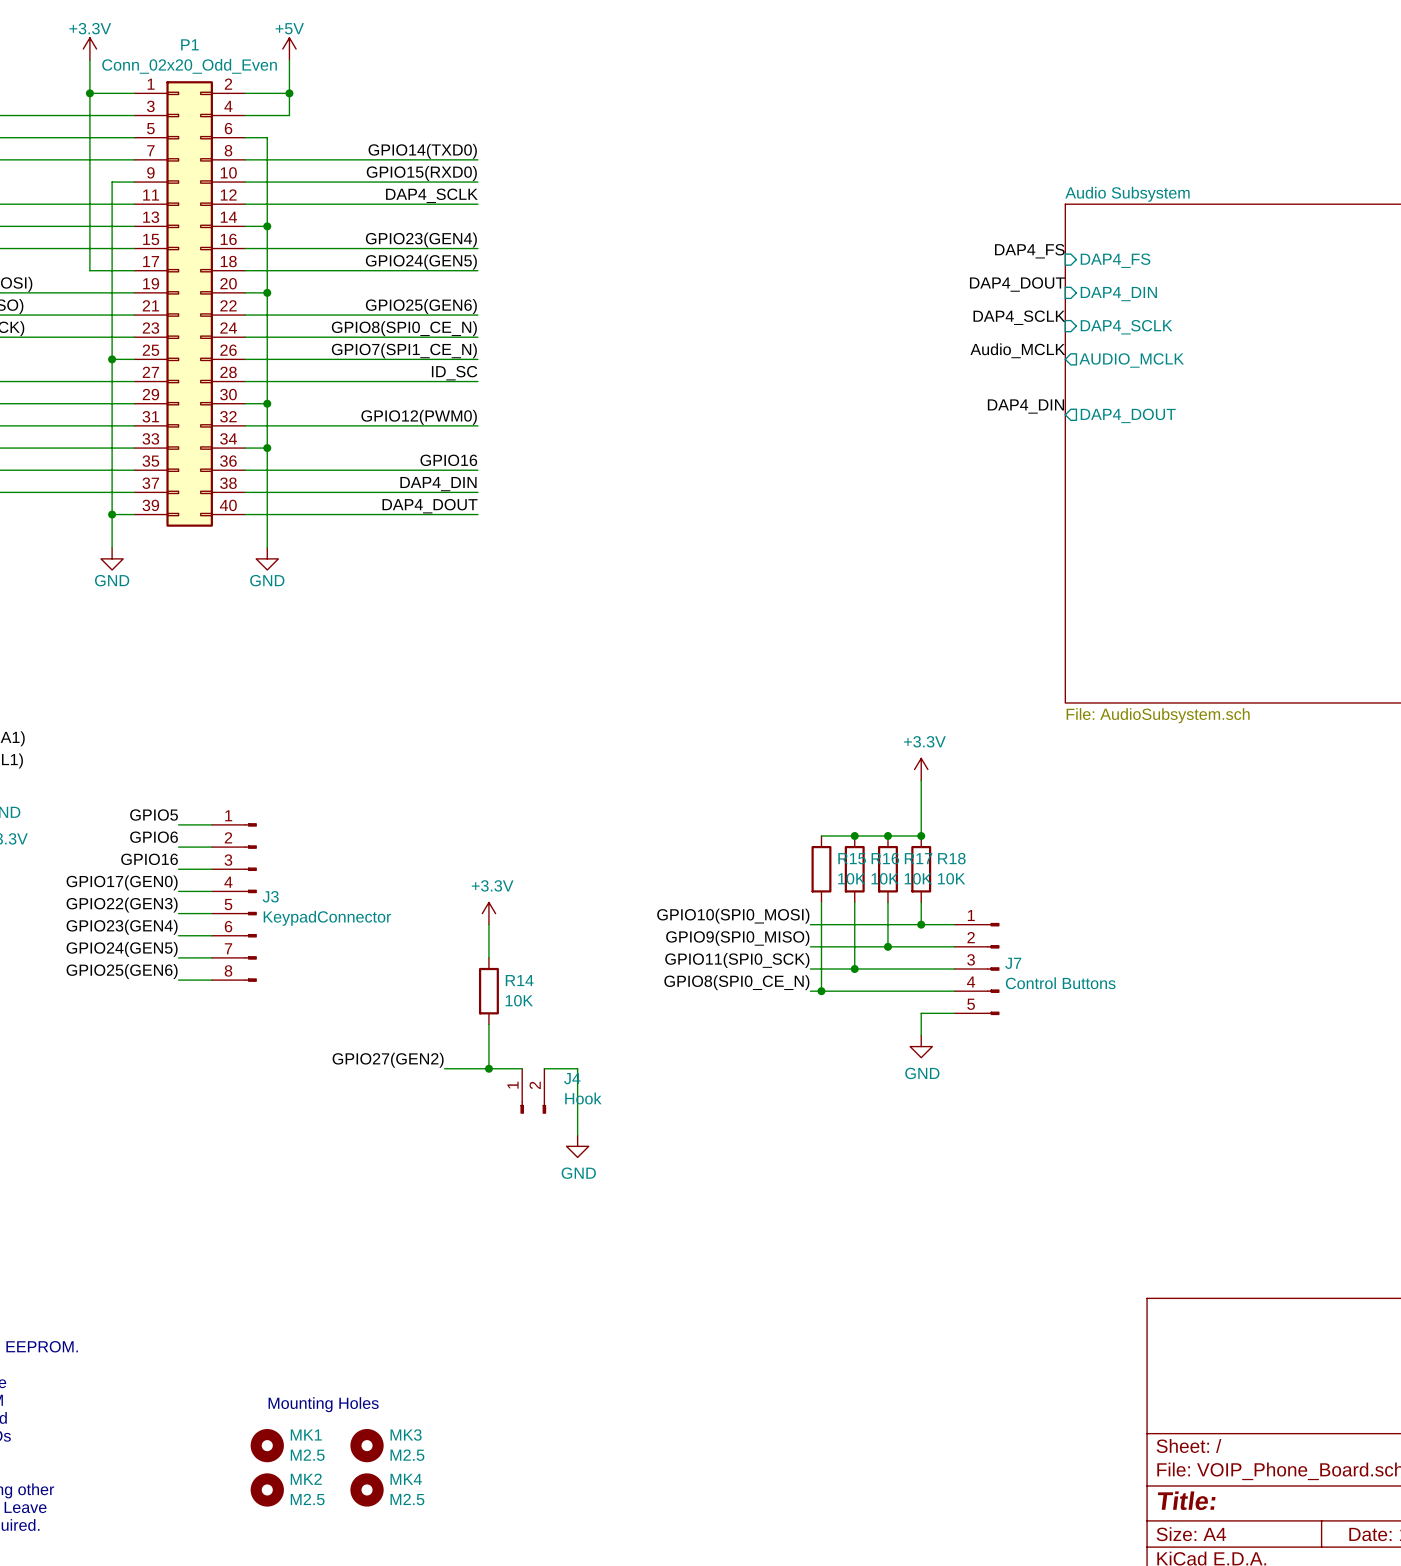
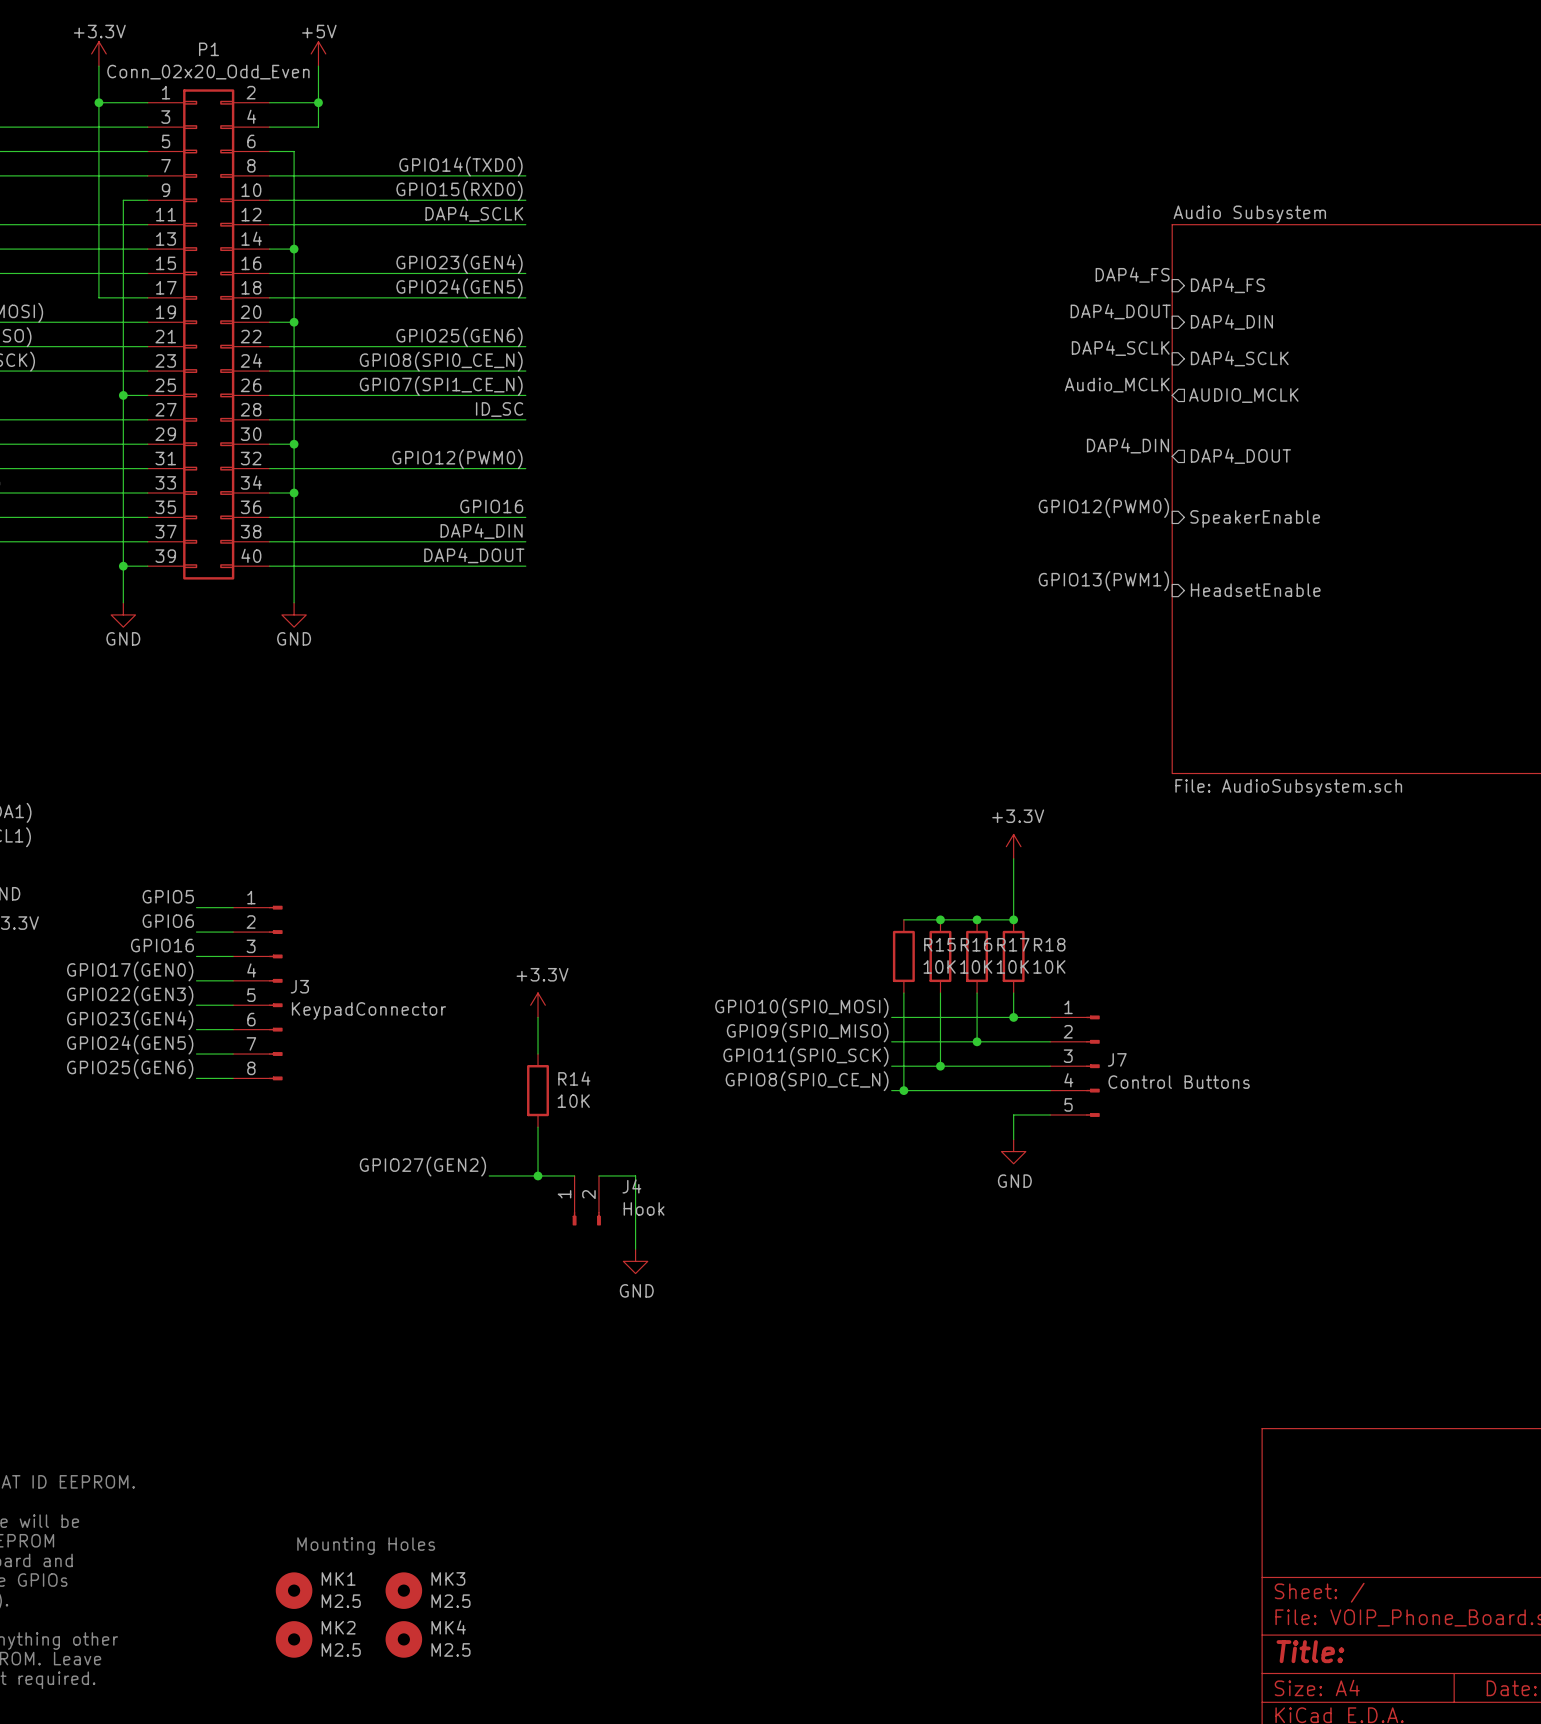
label: none -> GPIO12(PWM0) (1103, 507)
sheet pin: none -> SpeakerEnable (1255, 518)
label: none -> GPIO13(PWM1) (1103, 581)
sheet pin: none -> HeadsetEnable (1255, 590)

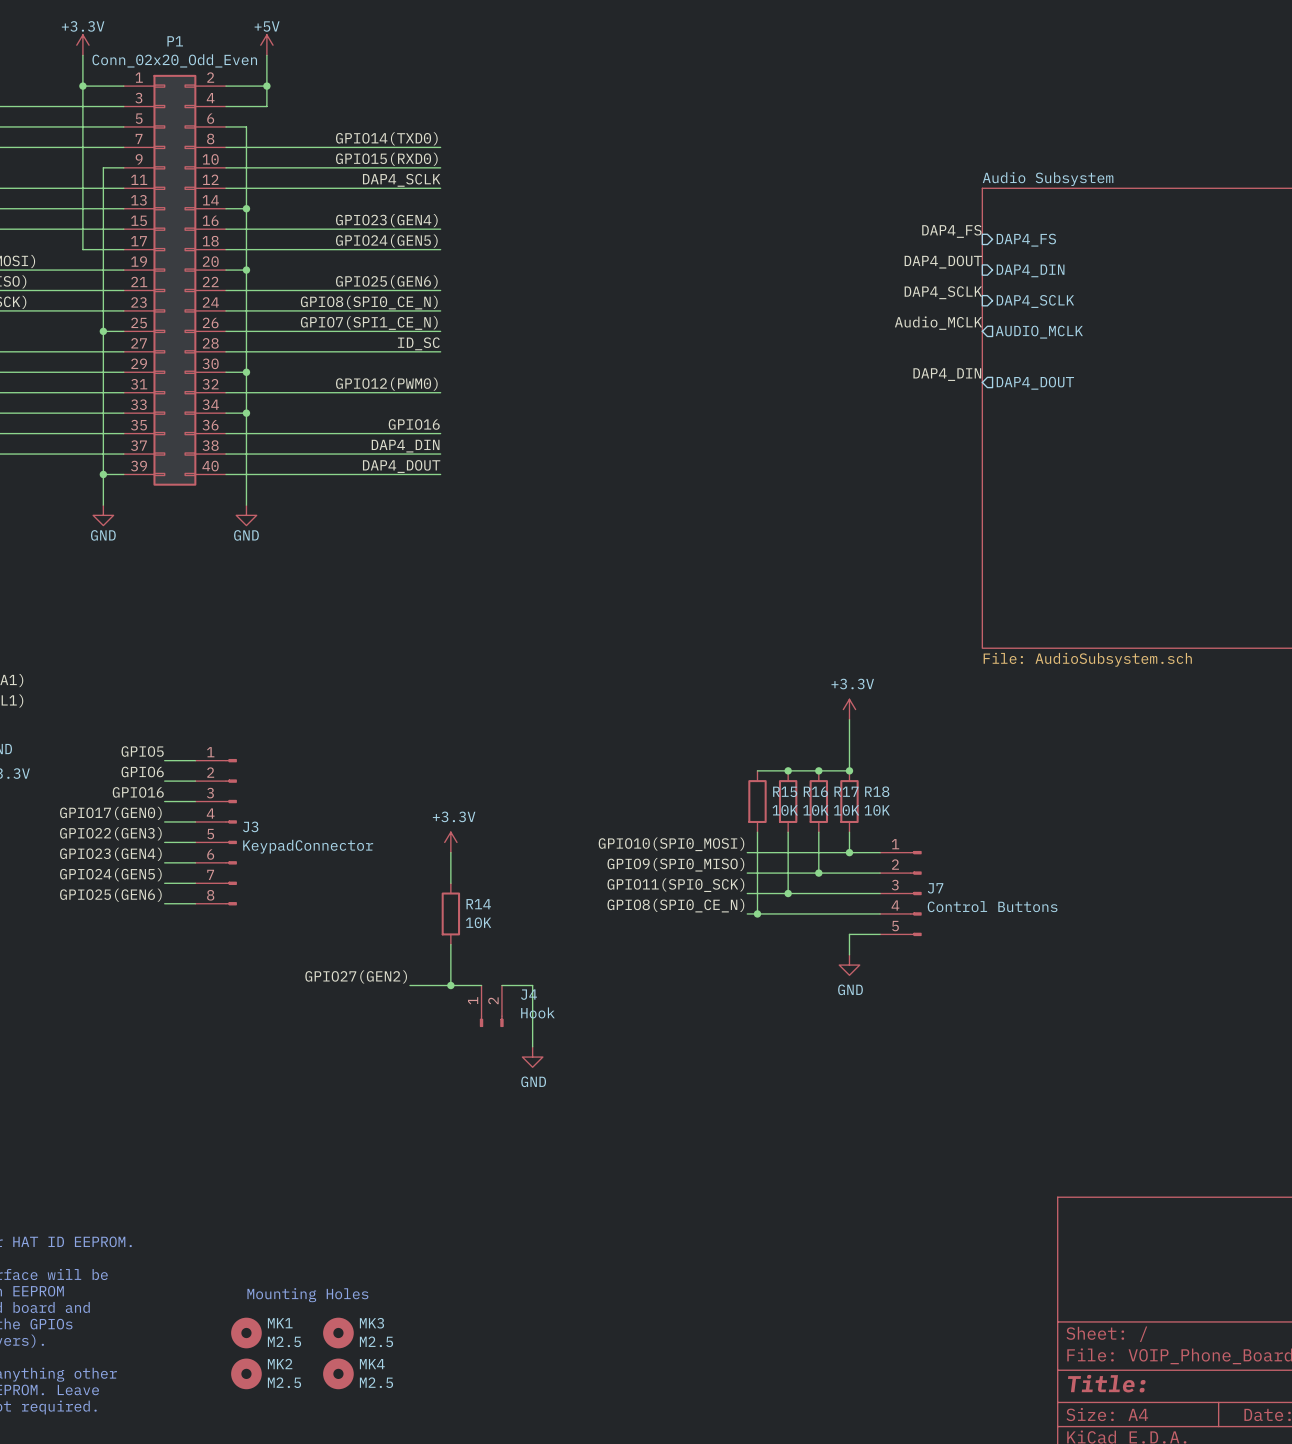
label: GPIO12(PWM0) (1103, 507) -> none
sheet pin: SpeakerEnable (1255, 518) -> none
label: GPIO13(PWM1) (1103, 581) -> none
sheet pin: HeadsetEnable (1255, 590) -> none

